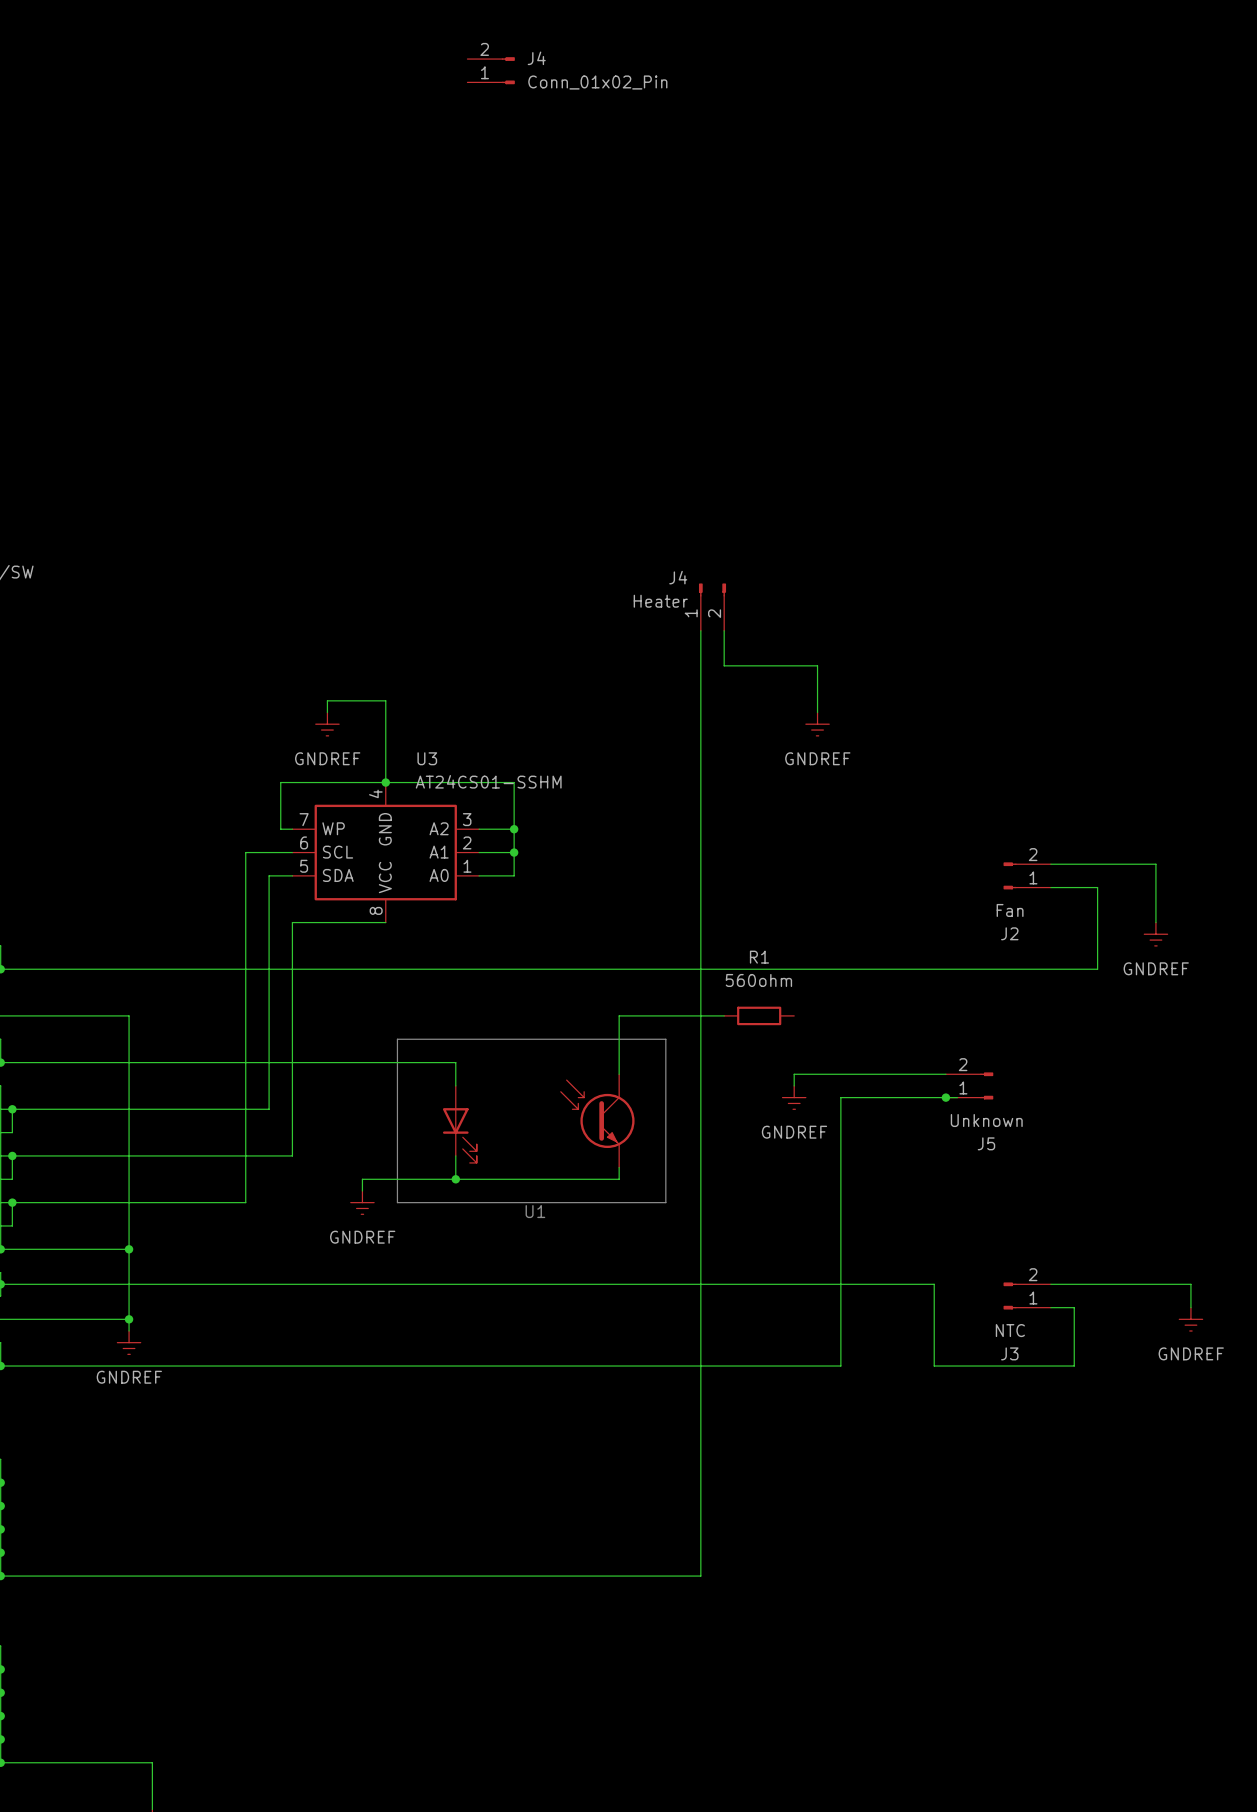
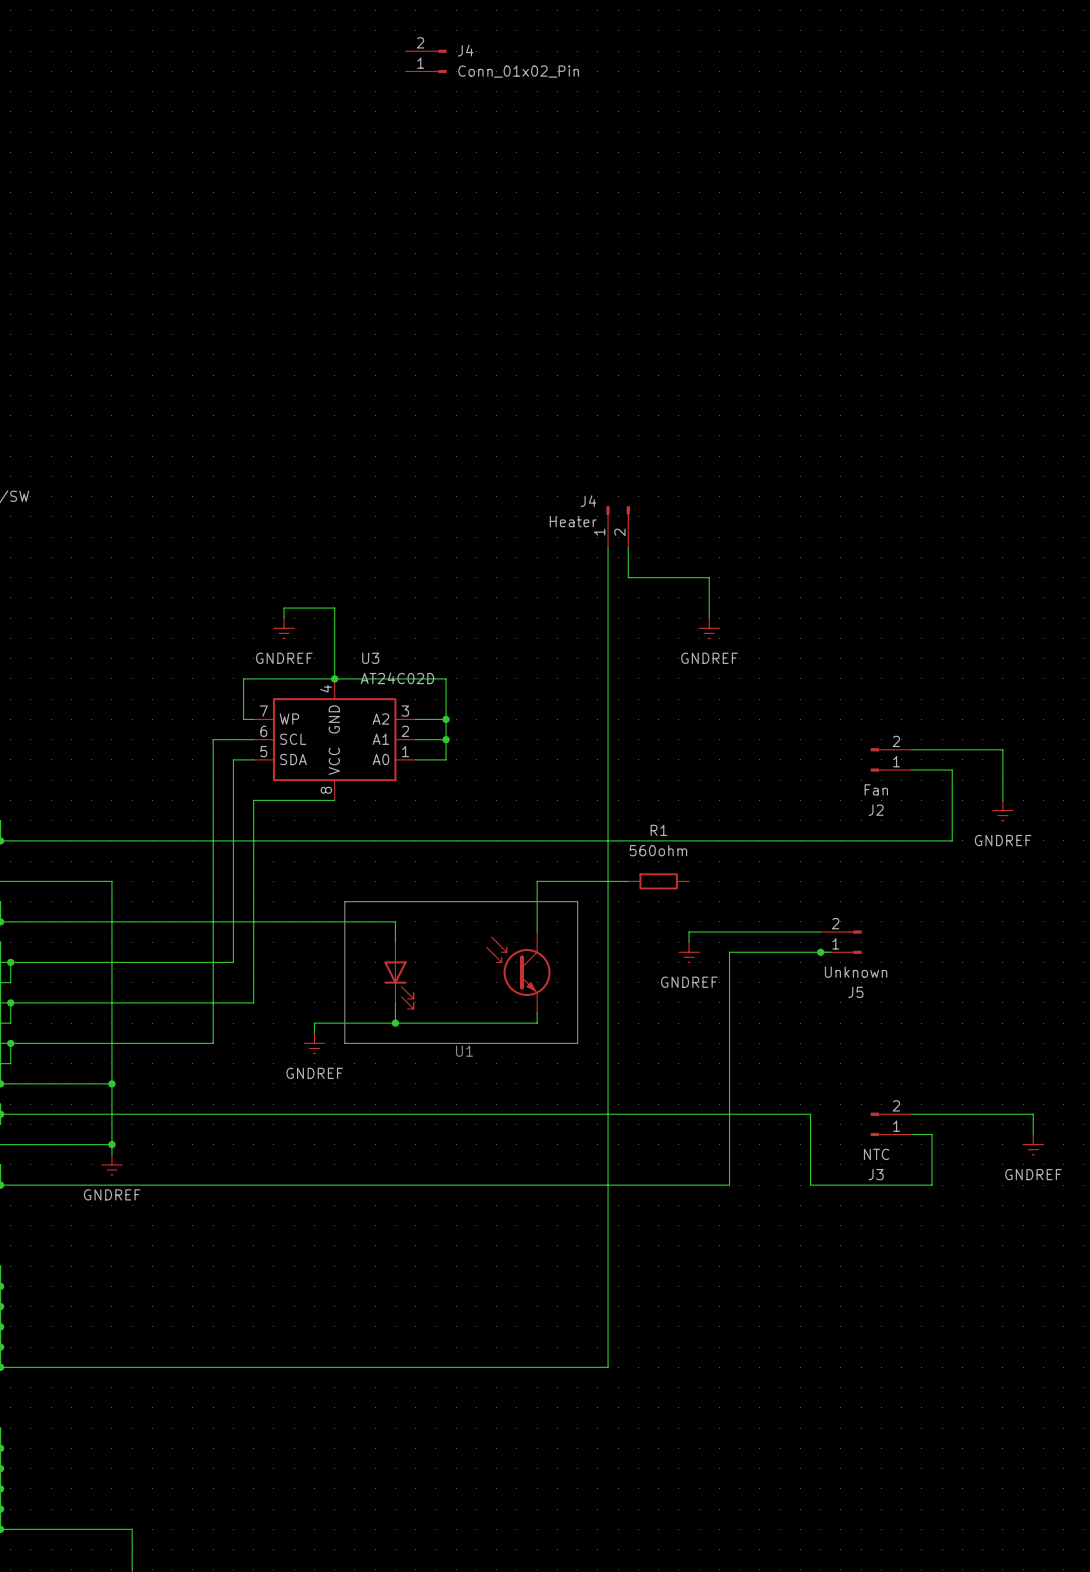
U3 value: AT24CS01-SSHM (488, 781) -> AT24C02D (397, 678)

